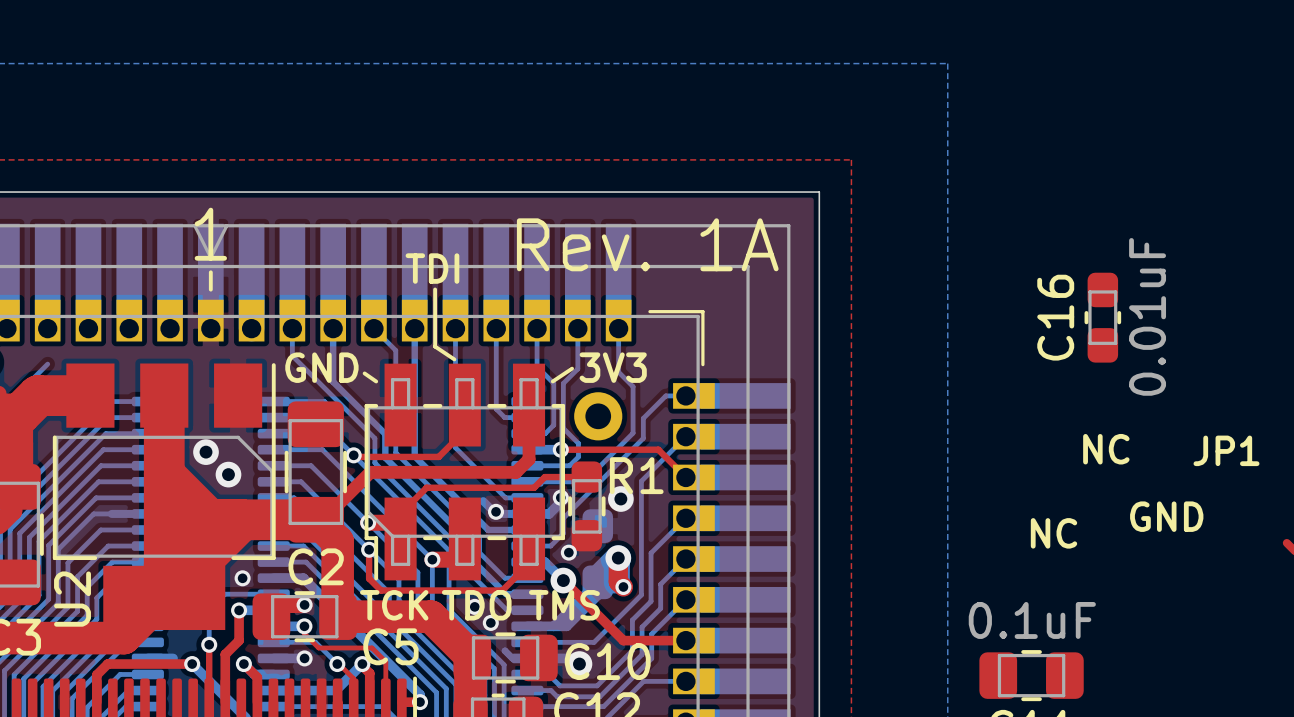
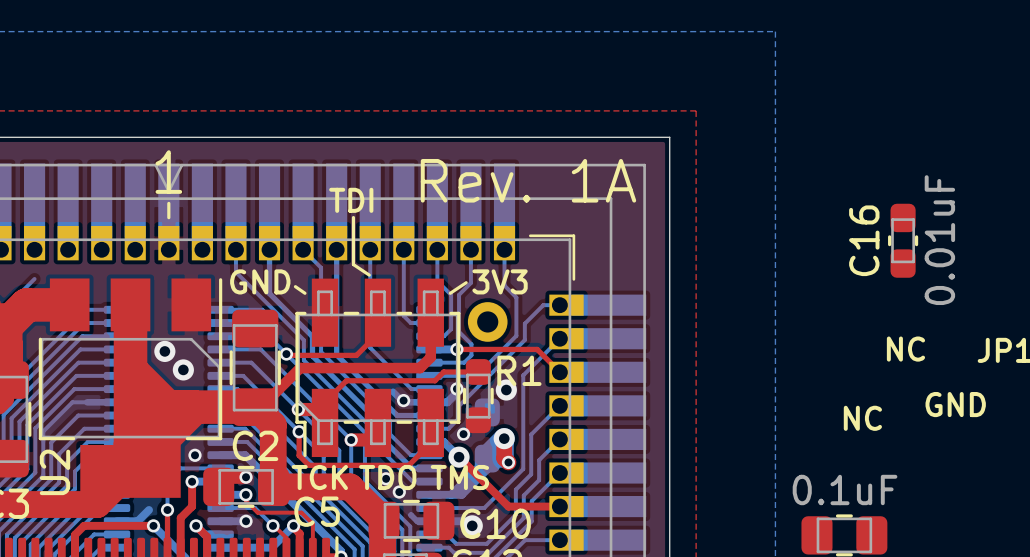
bottom track: none -> (149, 510) (137, 521)

